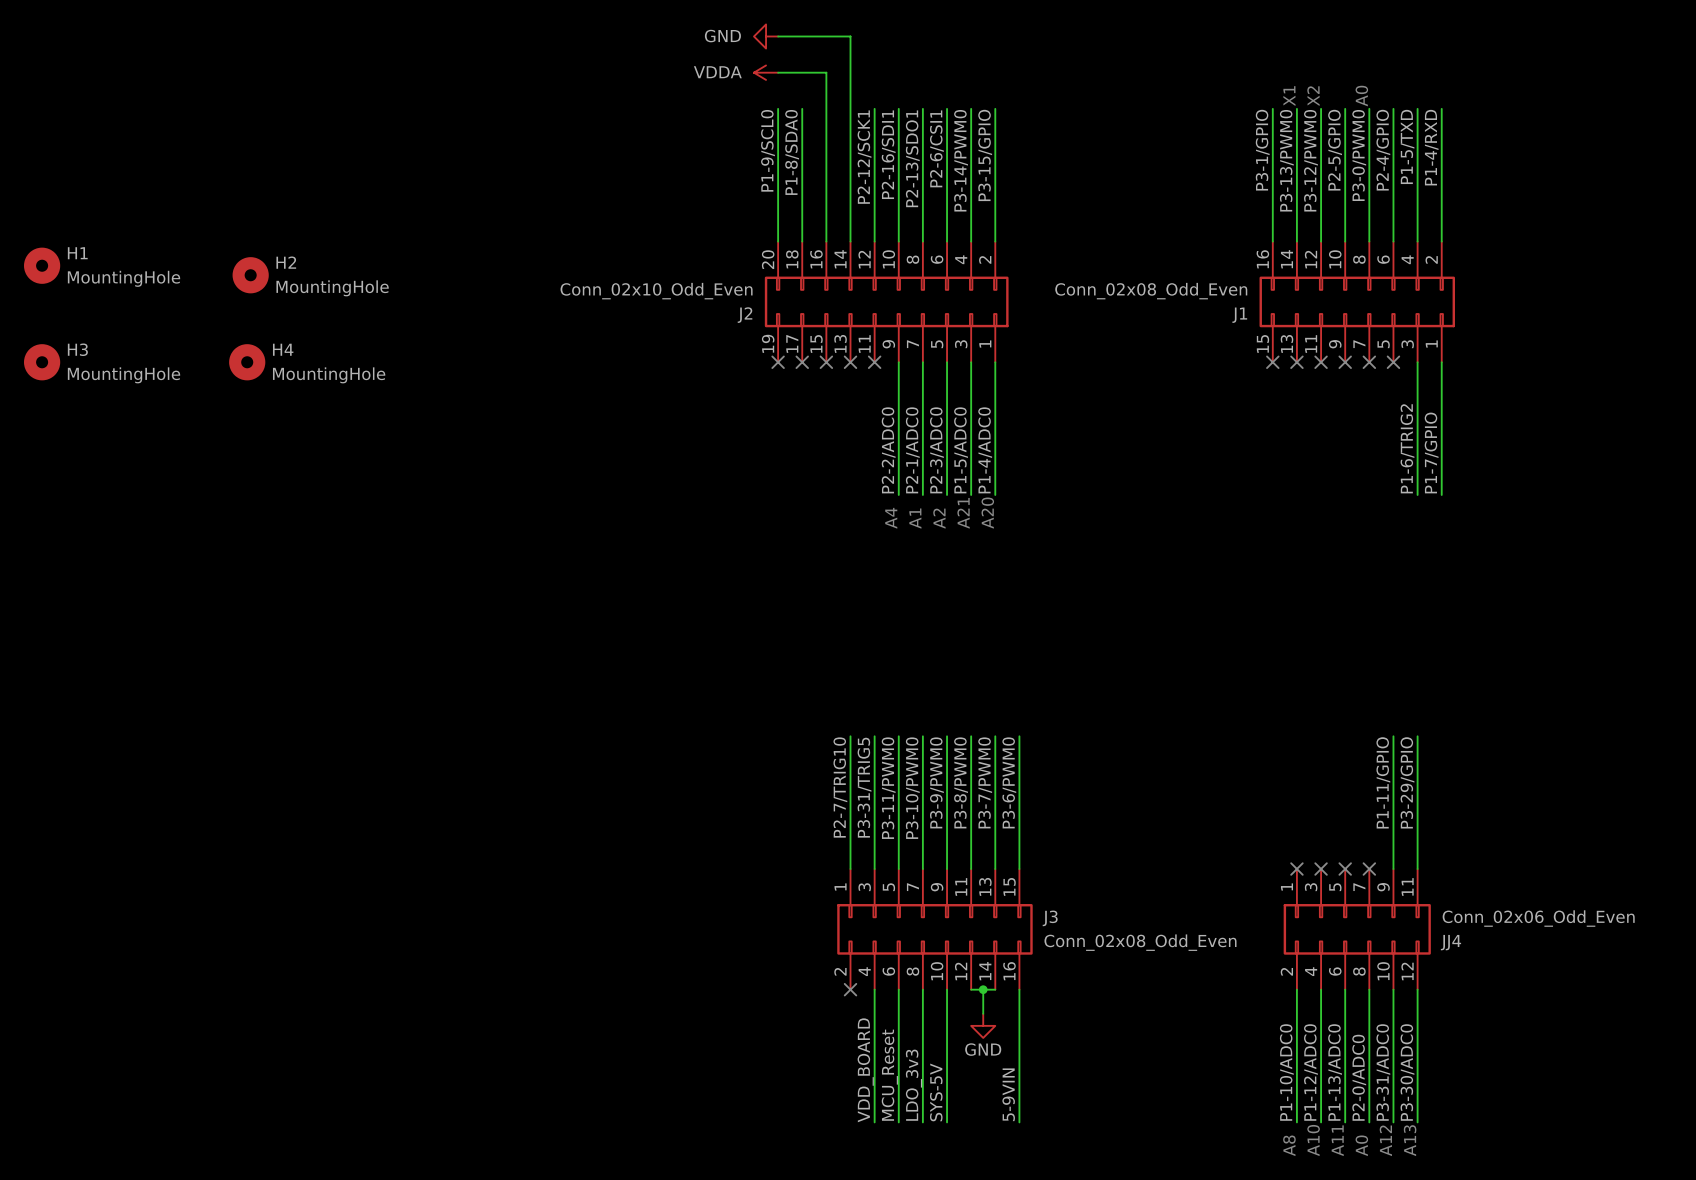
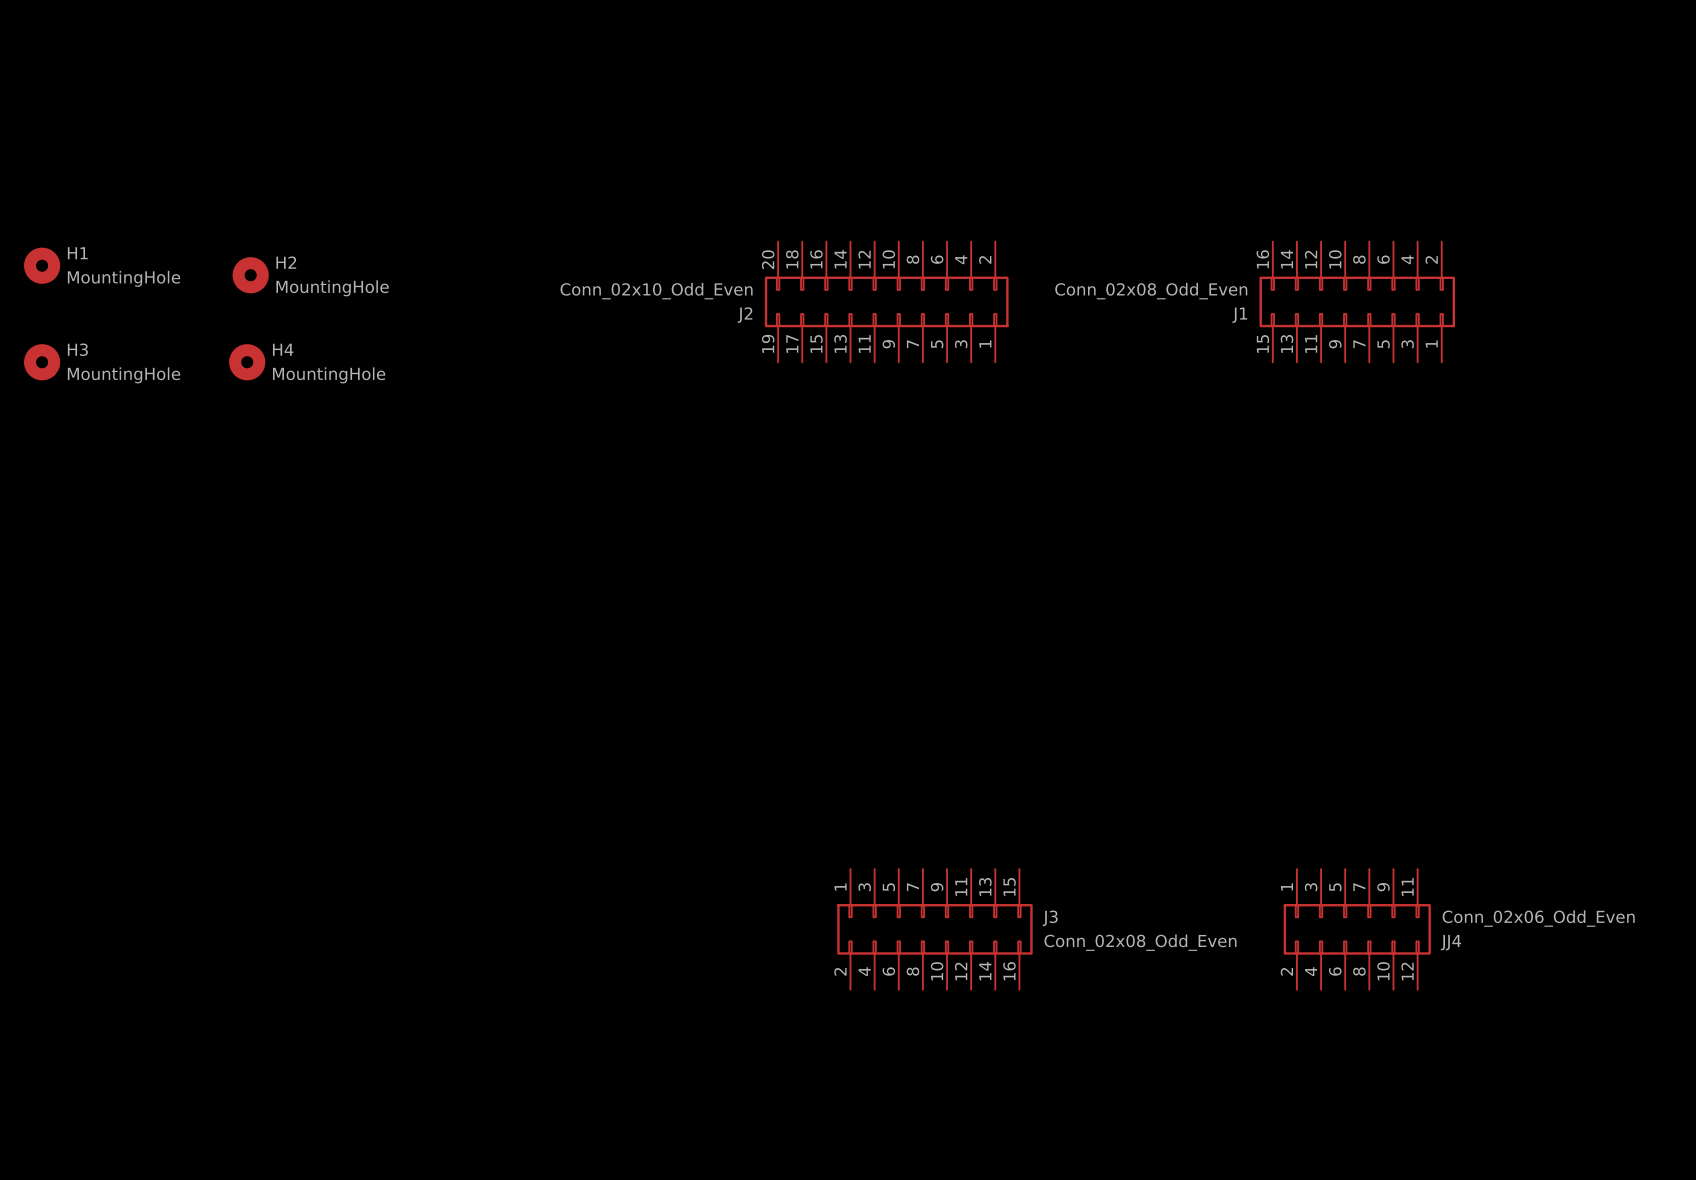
power symbol: GND (766, 36) -> none
wire: (778, 36) (850, 36) (850, 241) -> none
power symbol: VDDA (766, 72) -> none
wire: (778, 72) (826, 72) (826, 241) -> none
text: X1 (1289, 96) -> none
text: X2 (1313, 96) -> none
text: A0 (1361, 96) -> none
wire: (778, 108) (778, 241) -> none
wire: (802, 108) (802, 241) -> none
wire: (874, 108) (874, 241) -> none
wire: (898, 108) (898, 241) -> none
wire: (922, 108) (922, 241) -> none
wire: (947, 108) (947, 241) -> none
wire: (971, 108) (971, 241) -> none
wire: (995, 108) (995, 241) -> none
wire: (1272, 108) (1272, 241) -> none
wire: (1296, 108) (1296, 241) -> none
wire: (1321, 108) (1321, 241) -> none
wire: (1345, 108) (1345, 241) -> none
wire: (1369, 108) (1369, 241) -> none
wire: (1393, 108) (1393, 241) -> none
wire: (1417, 108) (1417, 241) -> none
wire: (1441, 108) (1441, 241) -> none
label: P1-5/TXD (1407, 146) -> none
label: P1-4/RXD (1431, 147) -> none
label: P2-6/CSI1 (936, 148) -> none
label: P1-9/SCL0 (768, 150) -> none
label: P3-1/GPIO (1262, 150) -> none
label: P2-5/GPIO (1335, 150) -> none
label: P2-4/GPIO (1383, 150) -> none
label: P1-8/SDA0 (792, 152) -> none
label: P2-16/SDI1 (888, 154) -> none
label: P3-15/GPIO (985, 155) -> none
label: P3-0/PWM0 (1359, 155) -> none
label: P2-12/SCK1 (864, 157) -> none
label: P2-13/SDO1 (912, 158) -> none
label: P3-14/PWM0 (961, 160) -> none
label: P3-13/PWM0 (1286, 160) -> none
label: P3-12/PWM0 (1310, 160) -> none
no-connect mark: (778, 362) -> none
no-connect mark: (802, 362) -> none
no-connect mark: (826, 362) -> none
no-connect mark: (850, 362) -> none
no-connect mark: (874, 362) -> none
wire: (898, 362) (898, 494) -> none
wire: (922, 362) (922, 494) -> none
wire: (947, 362) (947, 494) -> none
wire: (971, 362) (971, 494) -> none
wire: (995, 362) (995, 494) -> none
no-connect mark: (1272, 362) -> none
no-connect mark: (1296, 362) -> none
no-connect mark: (1321, 362) -> none
no-connect mark: (1345, 362) -> none
no-connect mark: (1369, 362) -> none
no-connect mark: (1393, 362) -> none
wire: (1417, 362) (1417, 494) -> none
wire: (1441, 362) (1441, 494) -> none
label: P1-6/TRIG2 (1407, 448) -> none
label: P2-2/ADC0 (888, 450) -> none
label: P2-1/ADC0 (912, 450) -> none
label: P2-3/ADC0 (936, 450) -> none
label: P1-5/ADC0 (961, 450) -> none
label: P1-4/ADC0 (985, 450) -> none
label: P1-7/GPIO (1431, 452) -> none
text: A21 (963, 513) -> none
text: A20 (987, 513) -> none
text: A4 (891, 518) -> none
text: A1 (915, 518) -> none
text: A2 (939, 518) -> none
wire: (850, 736) (850, 869) -> none
wire: (874, 736) (874, 869) -> none
wire: (898, 736) (898, 869) -> none
wire: (922, 736) (922, 869) -> none
wire: (947, 736) (947, 869) -> none
wire: (971, 736) (971, 869) -> none
wire: (995, 736) (995, 869) -> none
wire: (1019, 736) (1019, 869) -> none
wire: (1393, 736) (1393, 869) -> none
wire: (1417, 736) (1417, 869) -> none
label: P3-9/PWM0 (936, 782) -> none
label: P3-8/PWM0 (961, 782) -> none
label: P3-7/PWM0 (985, 782) -> none
label: P3-6/PWM0 (1009, 782) -> none
label: P1-11/GPIO (1383, 782) -> none
label: P3-29/GPIO (1407, 782) -> none
label: P2-7/TRIG10 (840, 787) -> none
label: P3-31/TRIG5 (864, 787) -> none
label: P3-11/PWM0 (888, 788) -> none
label: P3-10/PWM0 (912, 788) -> none
no-connect mark: (1296, 869) -> none
no-connect mark: (1321, 869) -> none
no-connect mark: (1345, 869) -> none
no-connect mark: (1369, 869) -> none
no-connect mark: (850, 989) -> none
wire: (874, 989) (874, 1122) -> none
wire: (898, 989) (898, 1122) -> none
wire: (922, 989) (922, 1122) -> none
wire: (947, 989) (947, 1122) -> none
wire: (971, 989) (995, 989) -> none
wire: (983, 989) (983, 1013) -> none
junction: (983, 989) -> none
wire: (1019, 989) (1019, 1122) -> none
wire: (1296, 989) (1296, 1122) -> none
wire: (1321, 989) (1321, 1122) -> none
wire: (1345, 989) (1345, 1122) -> none
wire: (1369, 989) (1369, 1122) -> none
wire: (1393, 989) (1393, 1122) -> none
wire: (1417, 989) (1417, 1122) -> none
power symbol: GND (983, 1025) -> none
label: VDD_BOARD (865, 1070) -> none
label: P1-10/ADC0 (1286, 1072) -> none
label: P1-12/ADC0 (1310, 1072) -> none
label: P1-13/ADC0 (1335, 1072) -> none
label: P3-31/ADC0 (1383, 1072) -> none
label: P3-30/ADC0 (1407, 1072) -> none
label: MCU_Reset (889, 1075) -> none
label: P2-0/ADC0 (1359, 1077) -> none
label: LDO_3v3 (913, 1085) -> none
label: SYS-5V (936, 1092) -> none
label: 5-9VIN (1008, 1094) -> none
text: A10 (1313, 1140) -> none
text: A11 (1337, 1140) -> none
text: A12 (1385, 1140) -> none
text: A13 (1410, 1140) -> none
text: A8 (1289, 1145) -> none
text: A0 (1361, 1145) -> none

